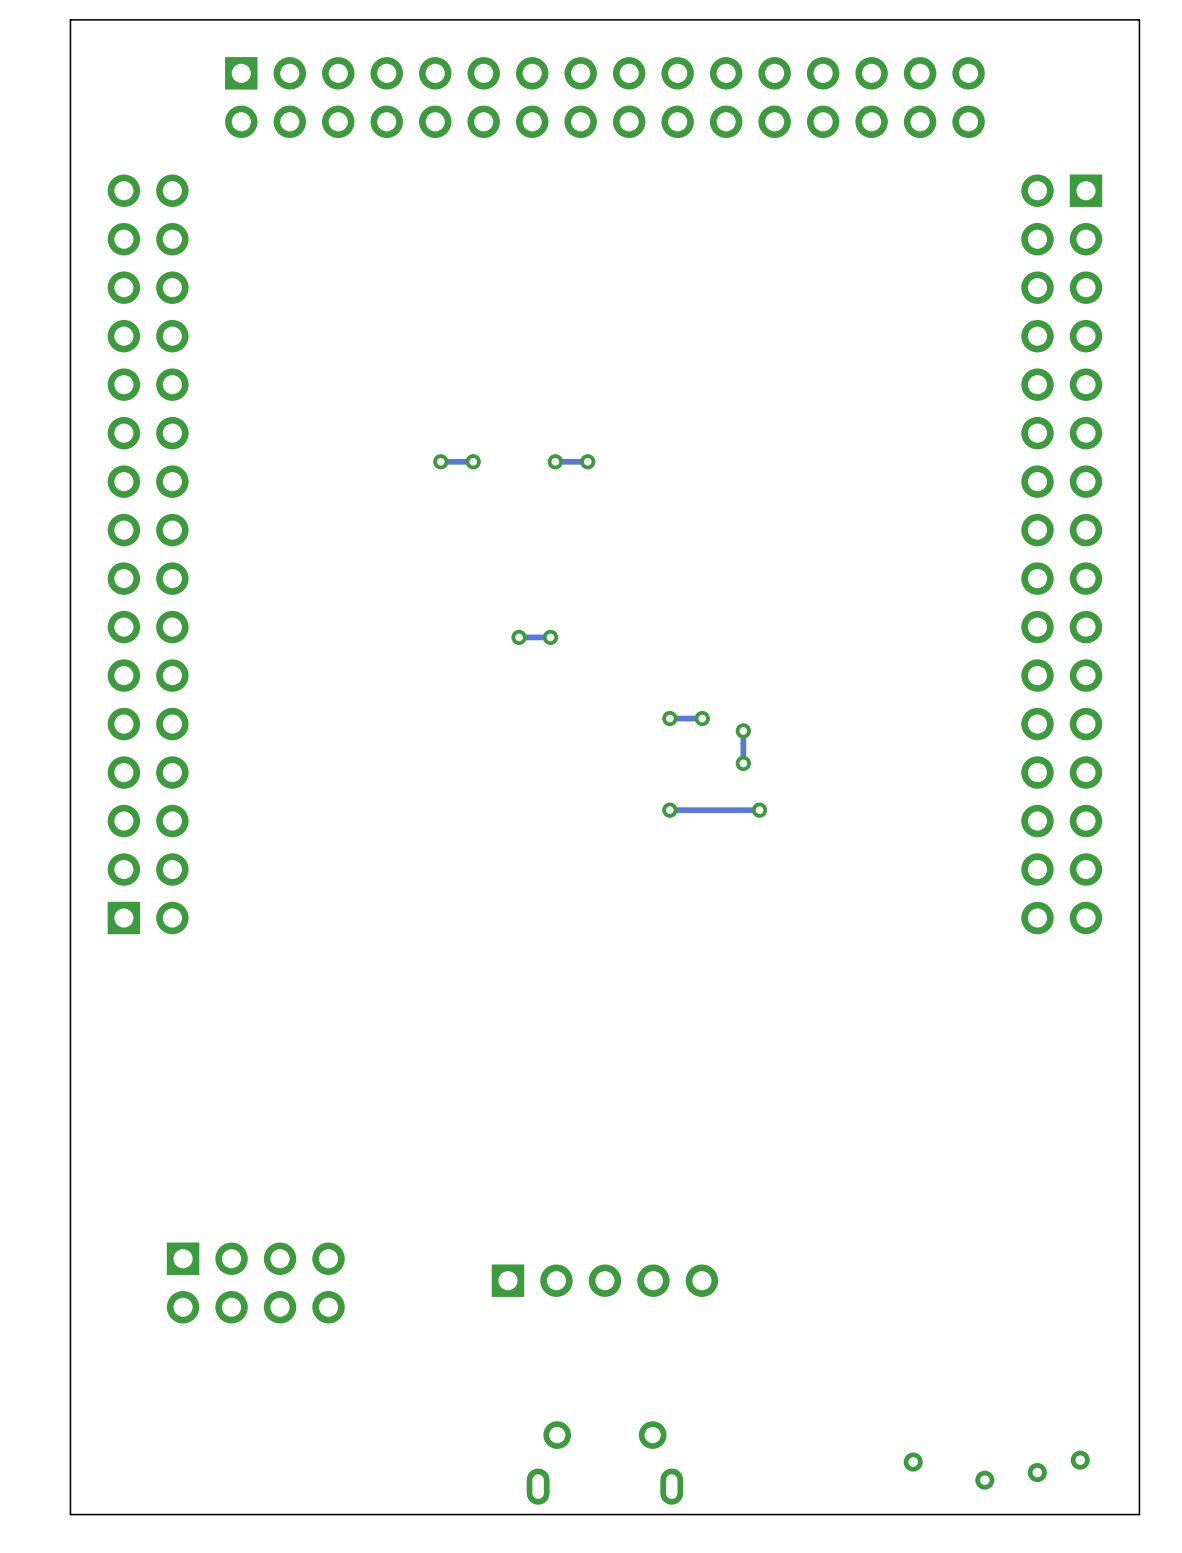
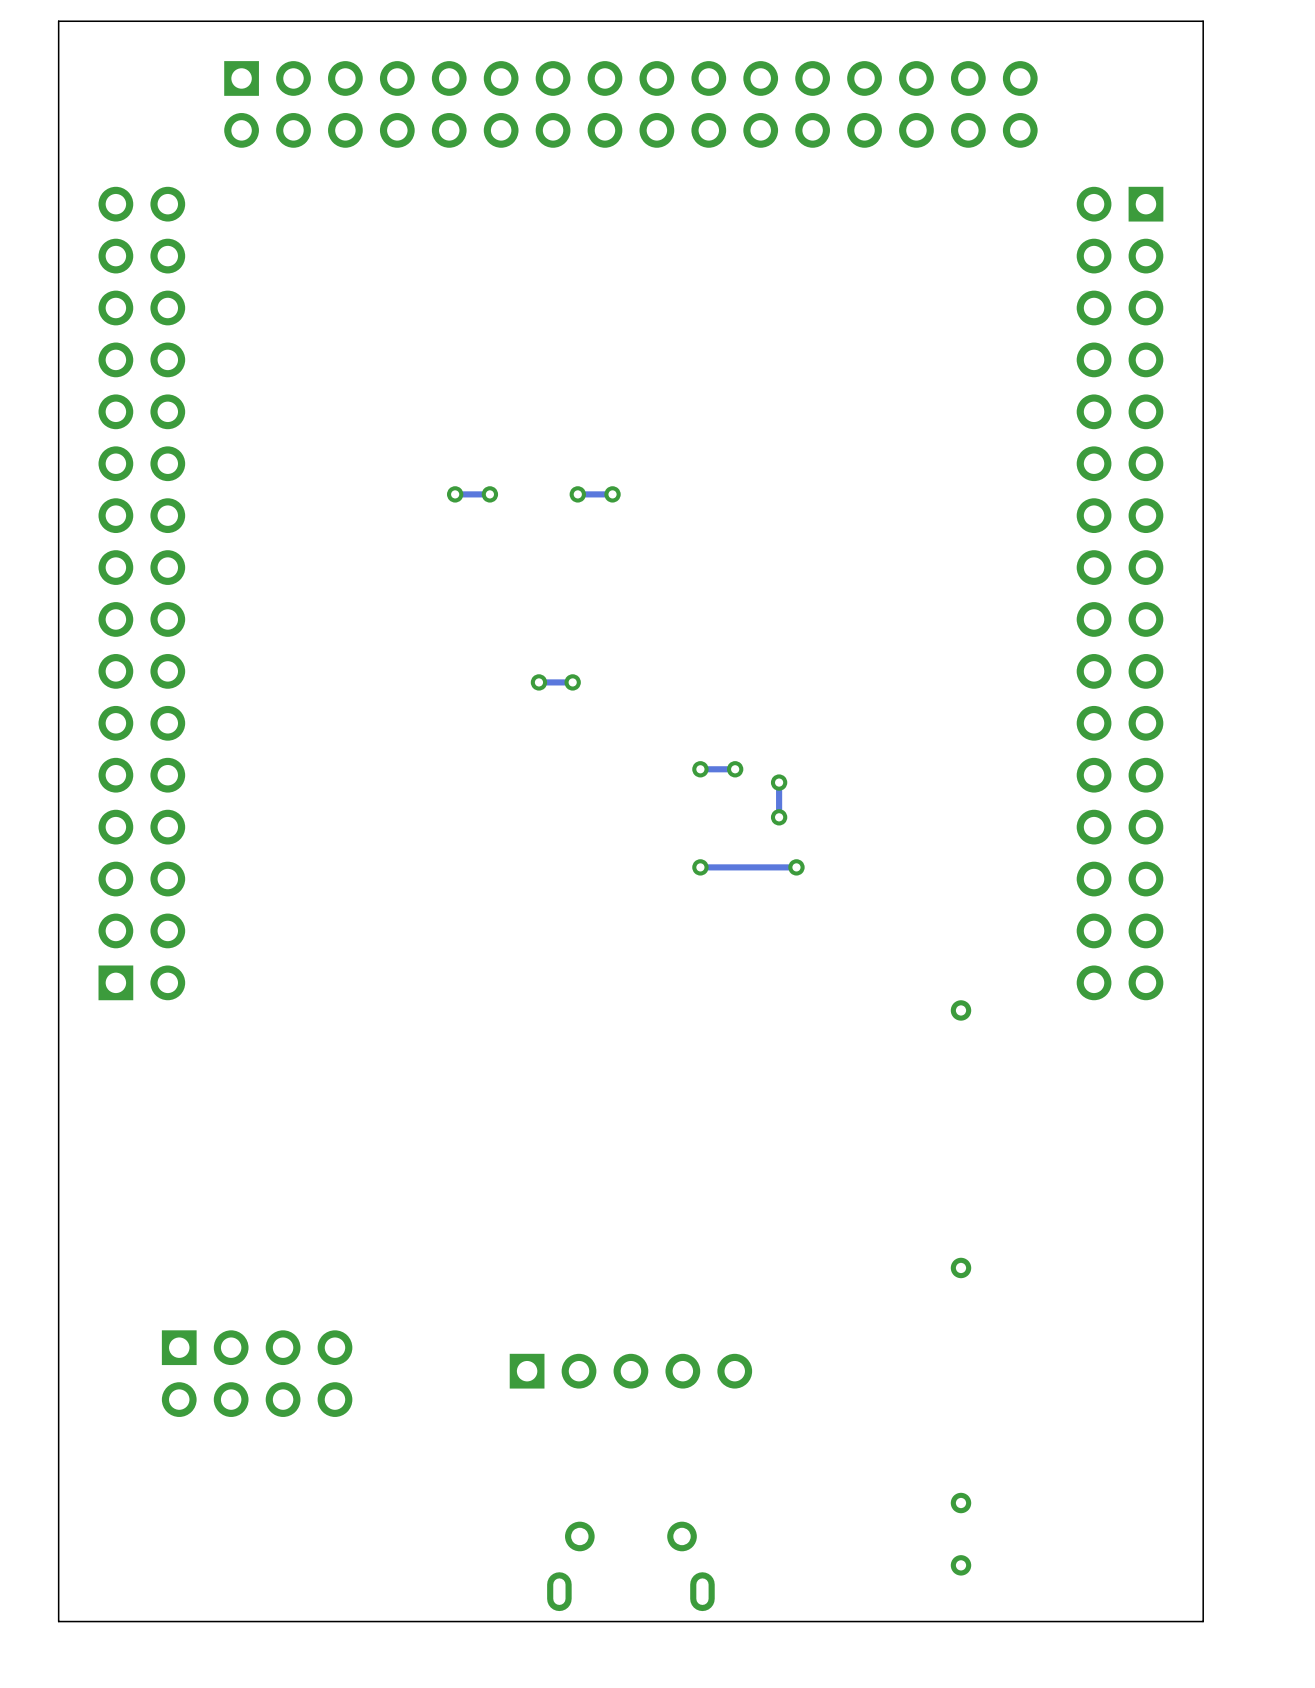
part: none -> (961, 1010)
part: none -> (961, 1267)
part: none -> (961, 1503)
part: (1080, 1460) -> none
part: (1037, 1472) -> none
part: (984, 1480) -> none

